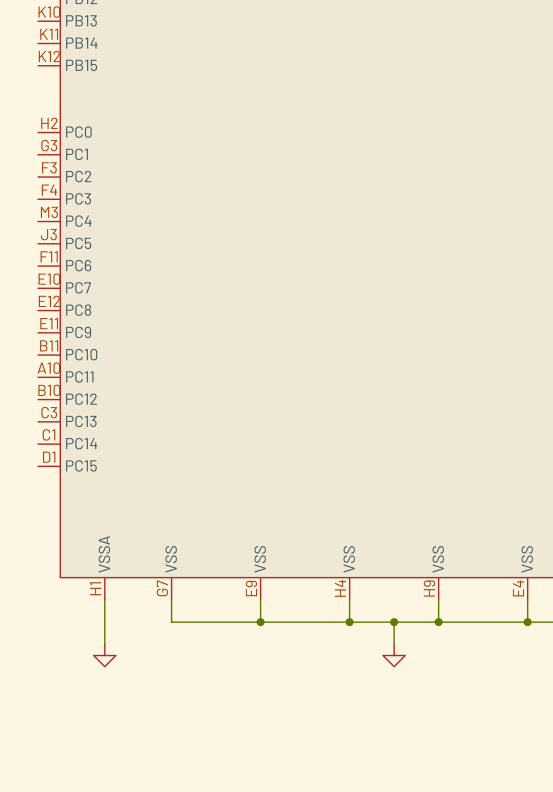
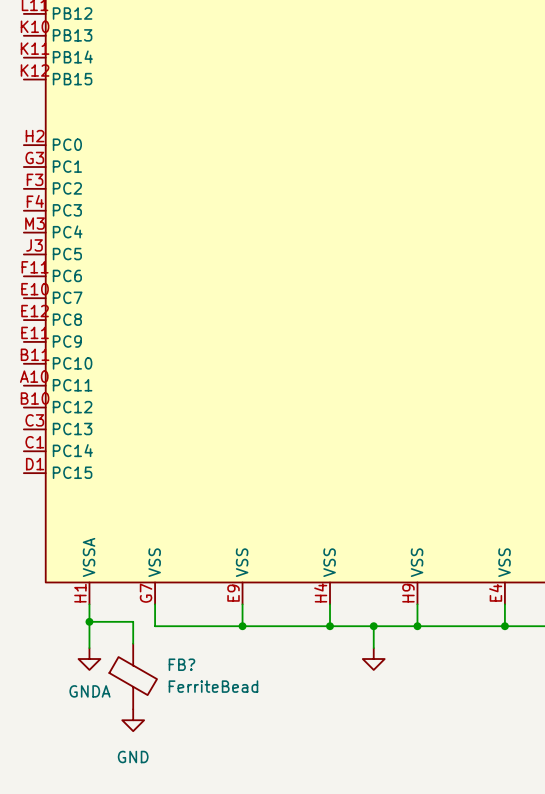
wire: none -> (89, 621) (133, 621) (133, 643)
junction: none -> (89, 621)
FB?: none -> FerriteBead (133, 676)
power symbol text: none -> GNDA (89, 691)
power symbol: none -> GND (133, 720)

